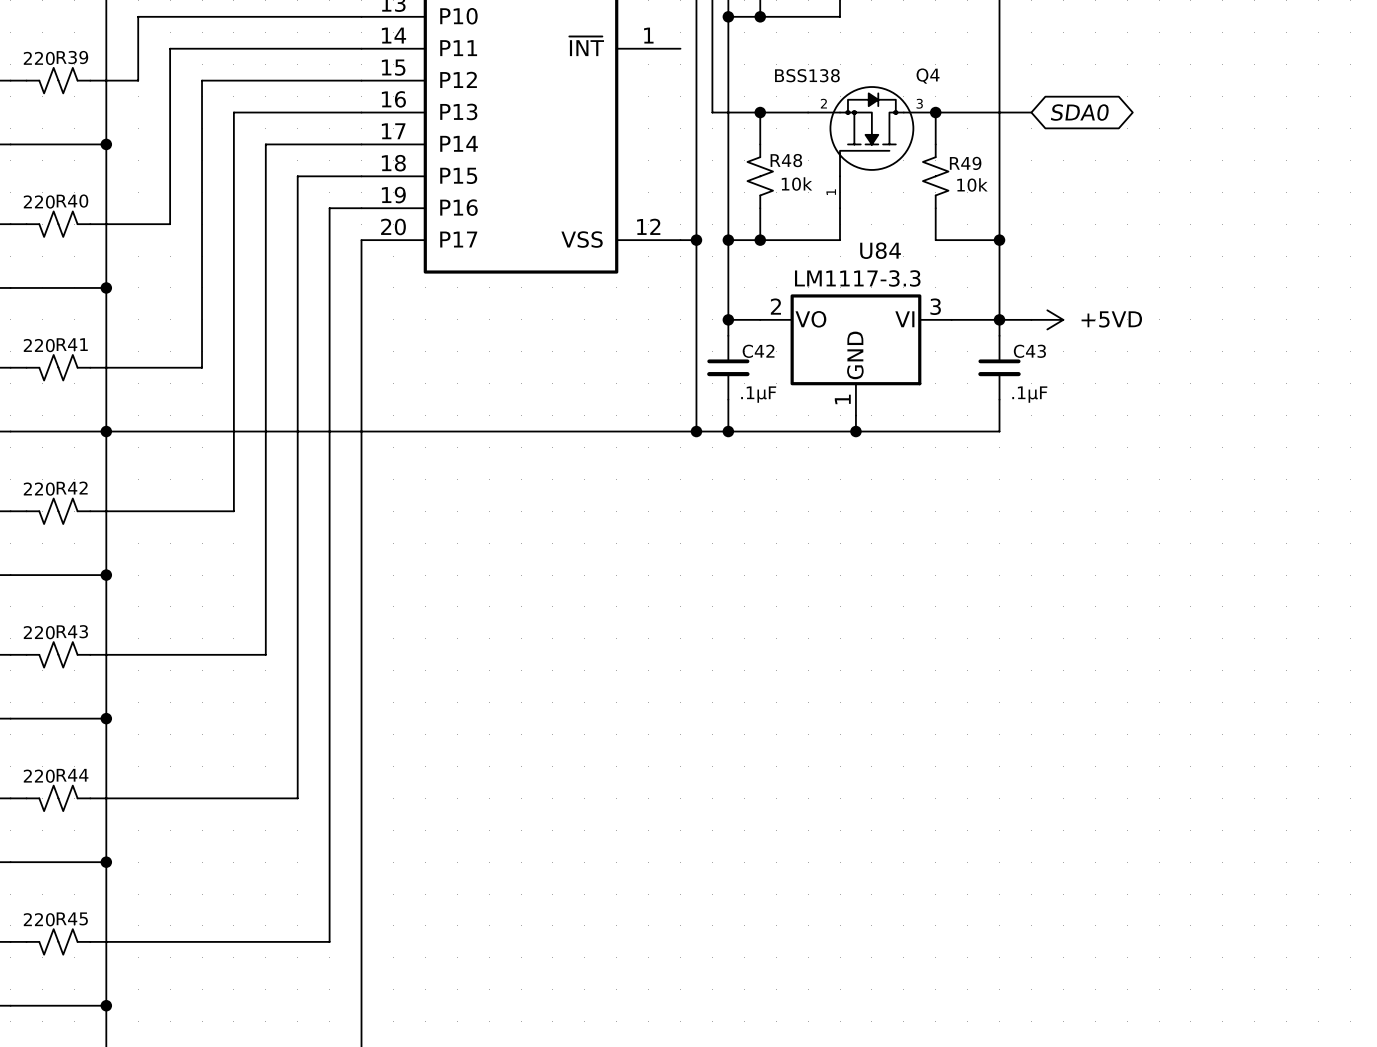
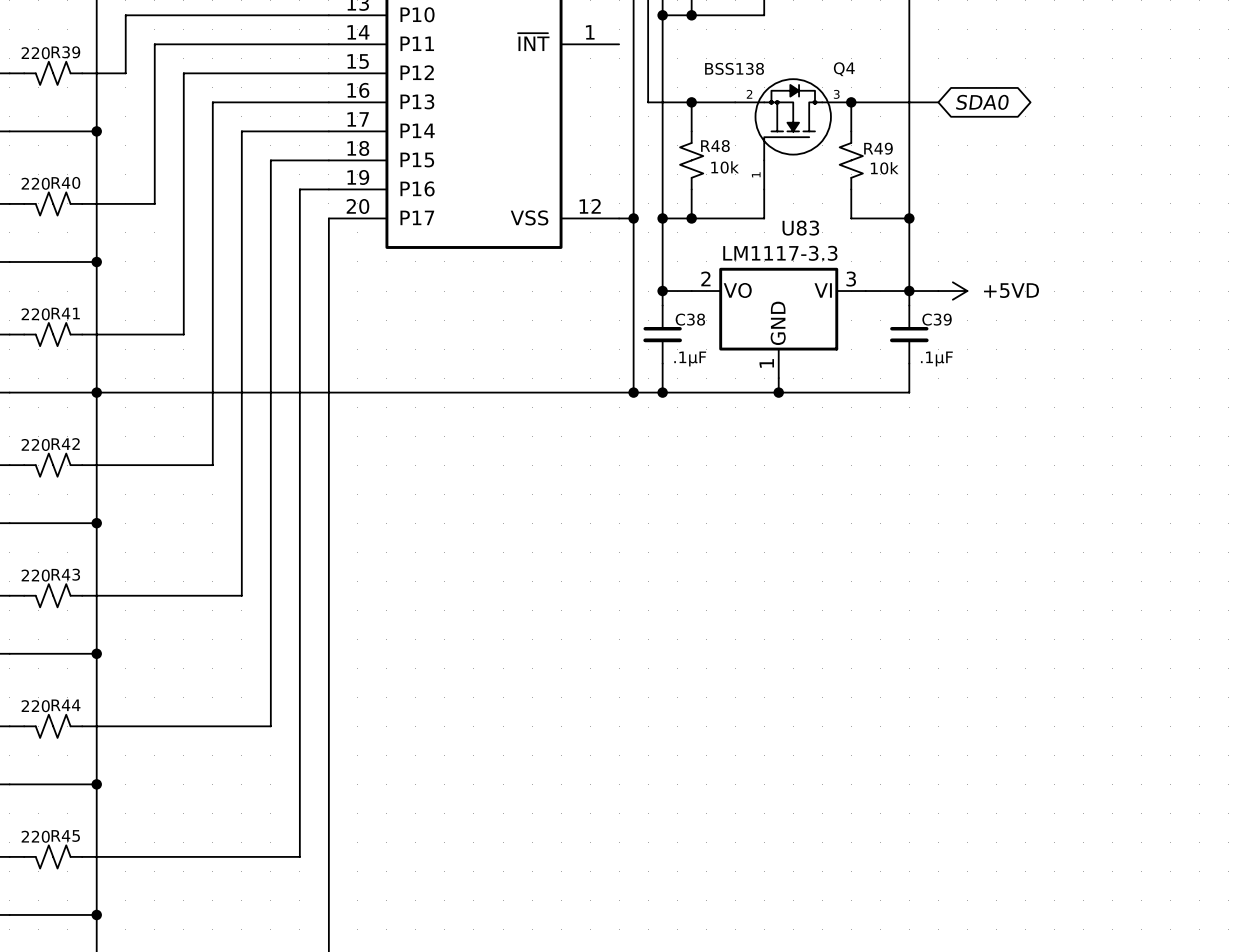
U84 name: U84 (880, 250) -> U83 (800, 228)
C42 name: C42 (758, 351) -> C38 (690, 319)
C43 name: C43 (1029, 351) -> C39 (937, 319)

